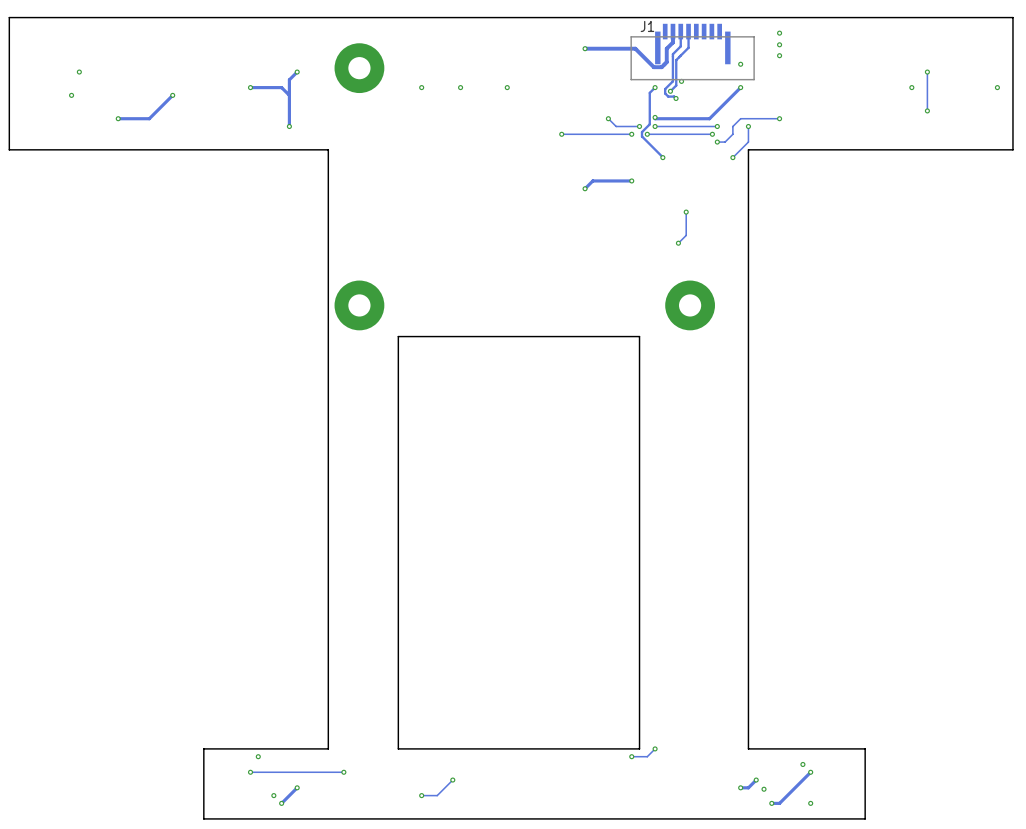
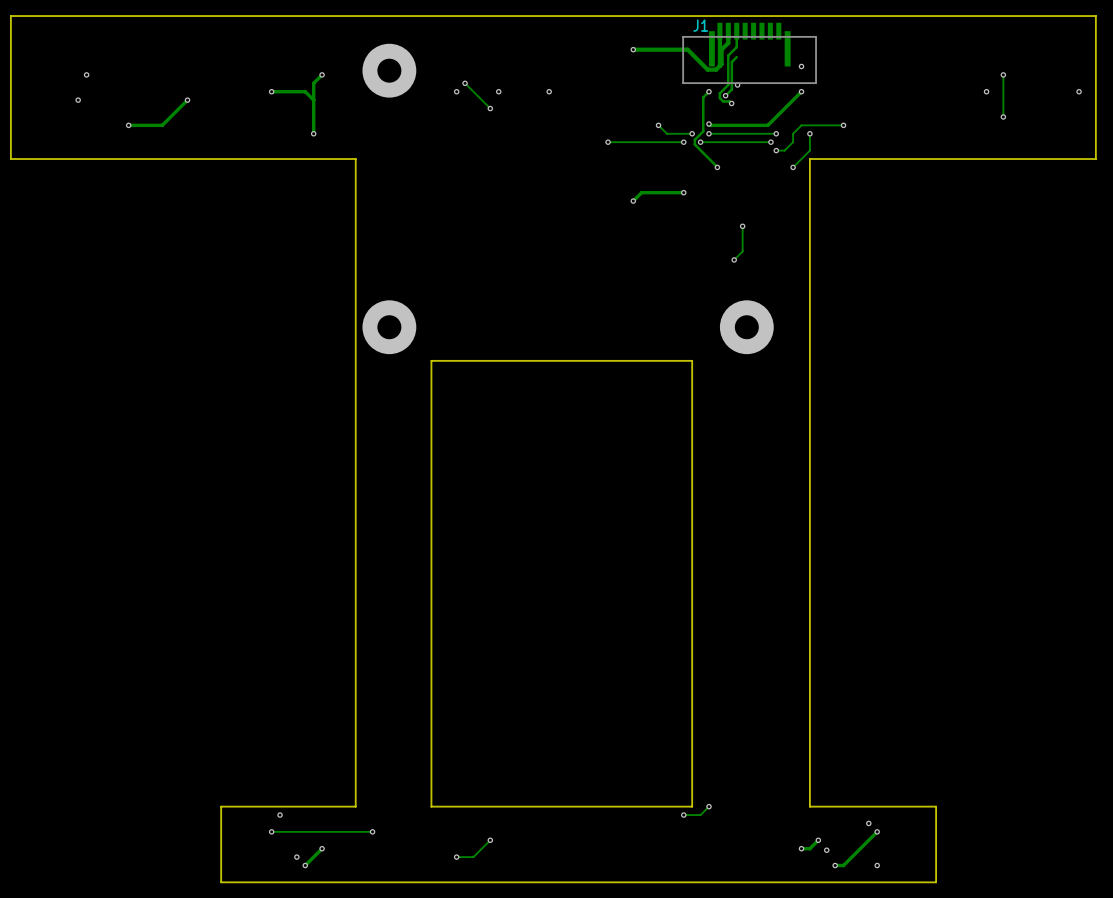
track: none -> (719, 31) (719, 65)
track: (688, 31) (688, 47) (680, 55) -> none
via: (779, 33) -> none
via: (779, 44) -> none
via: (779, 55) -> none
track: none -> (465, 83) (490, 108)
via: none -> (465, 83)
via: none -> (490, 108)

